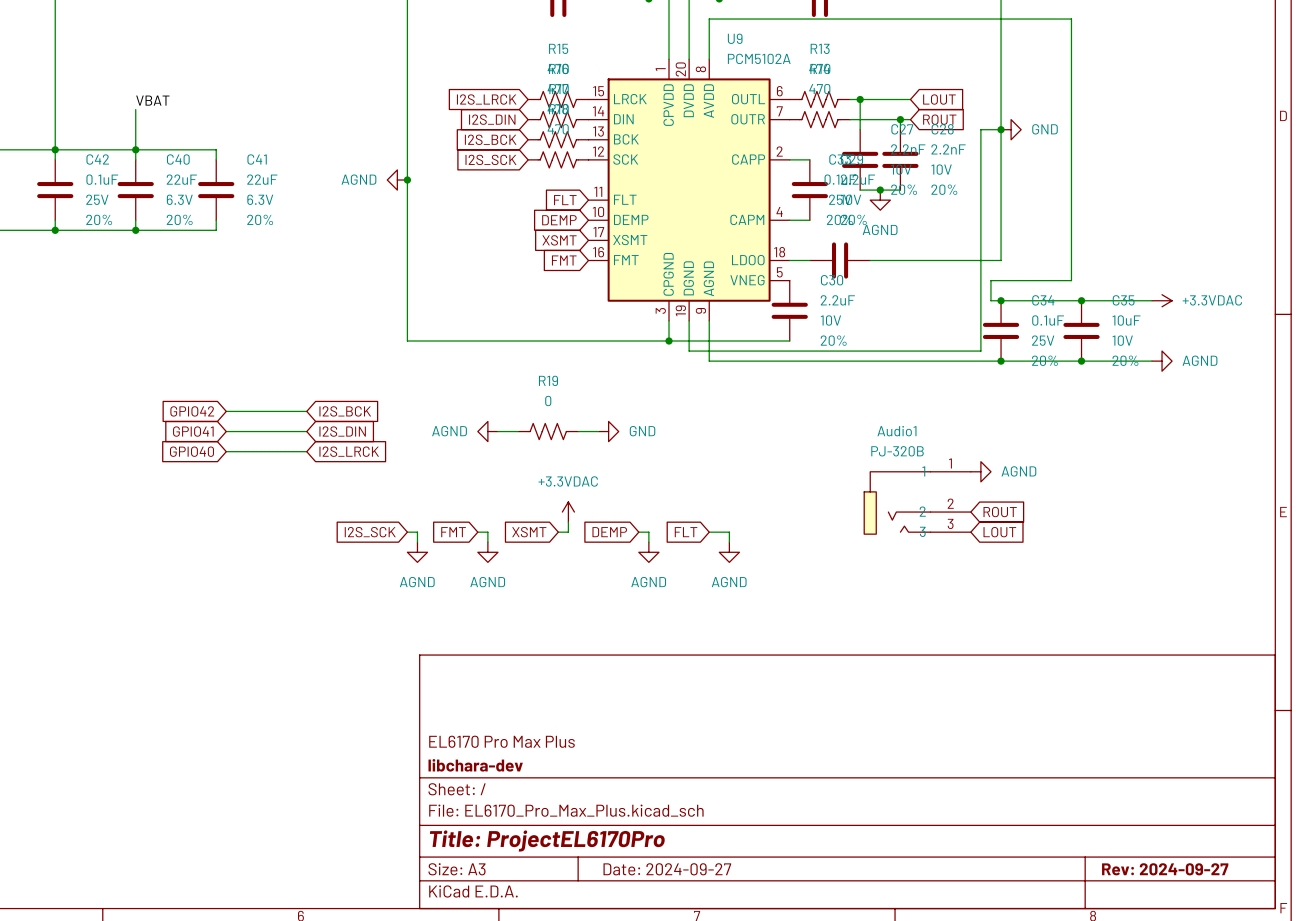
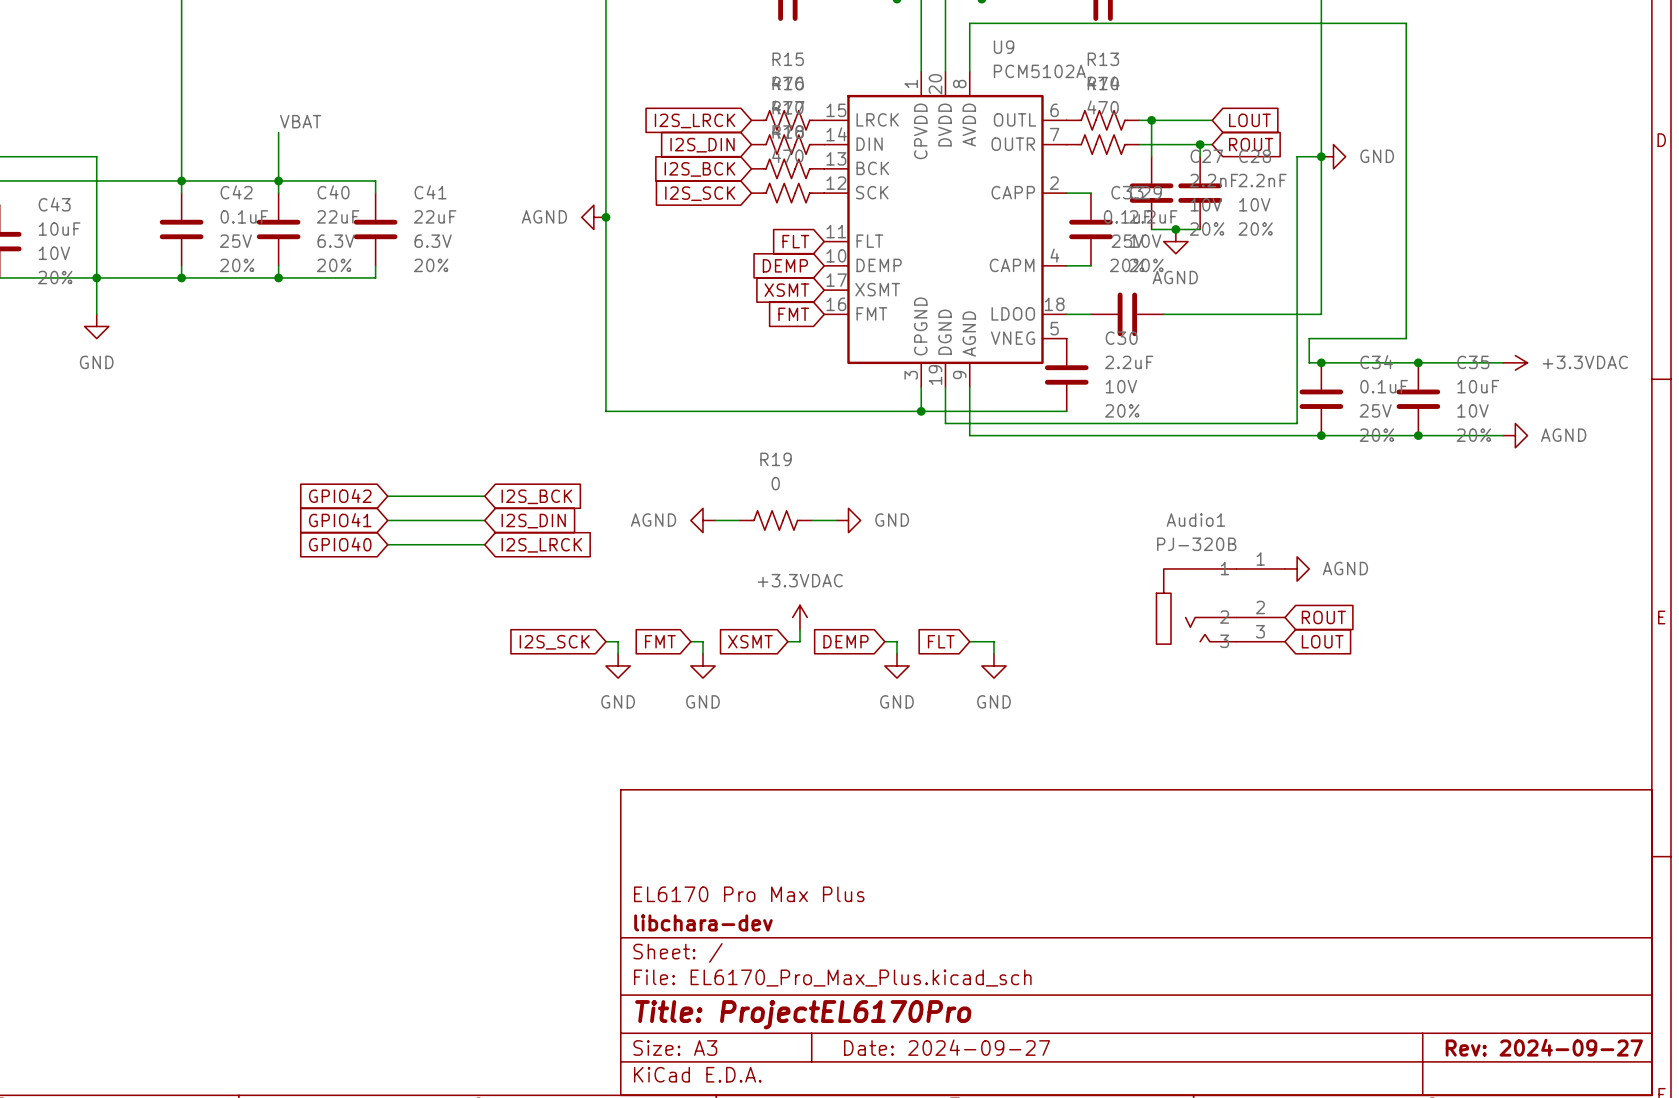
power symbol: AGND (417, 552) -> GND (618, 665)
power symbol: AGND (487, 552) -> GND (702, 665)
power symbol: AGND (648, 552) -> GND (896, 665)
power symbol: AGND (729, 552) -> GND (993, 665)

